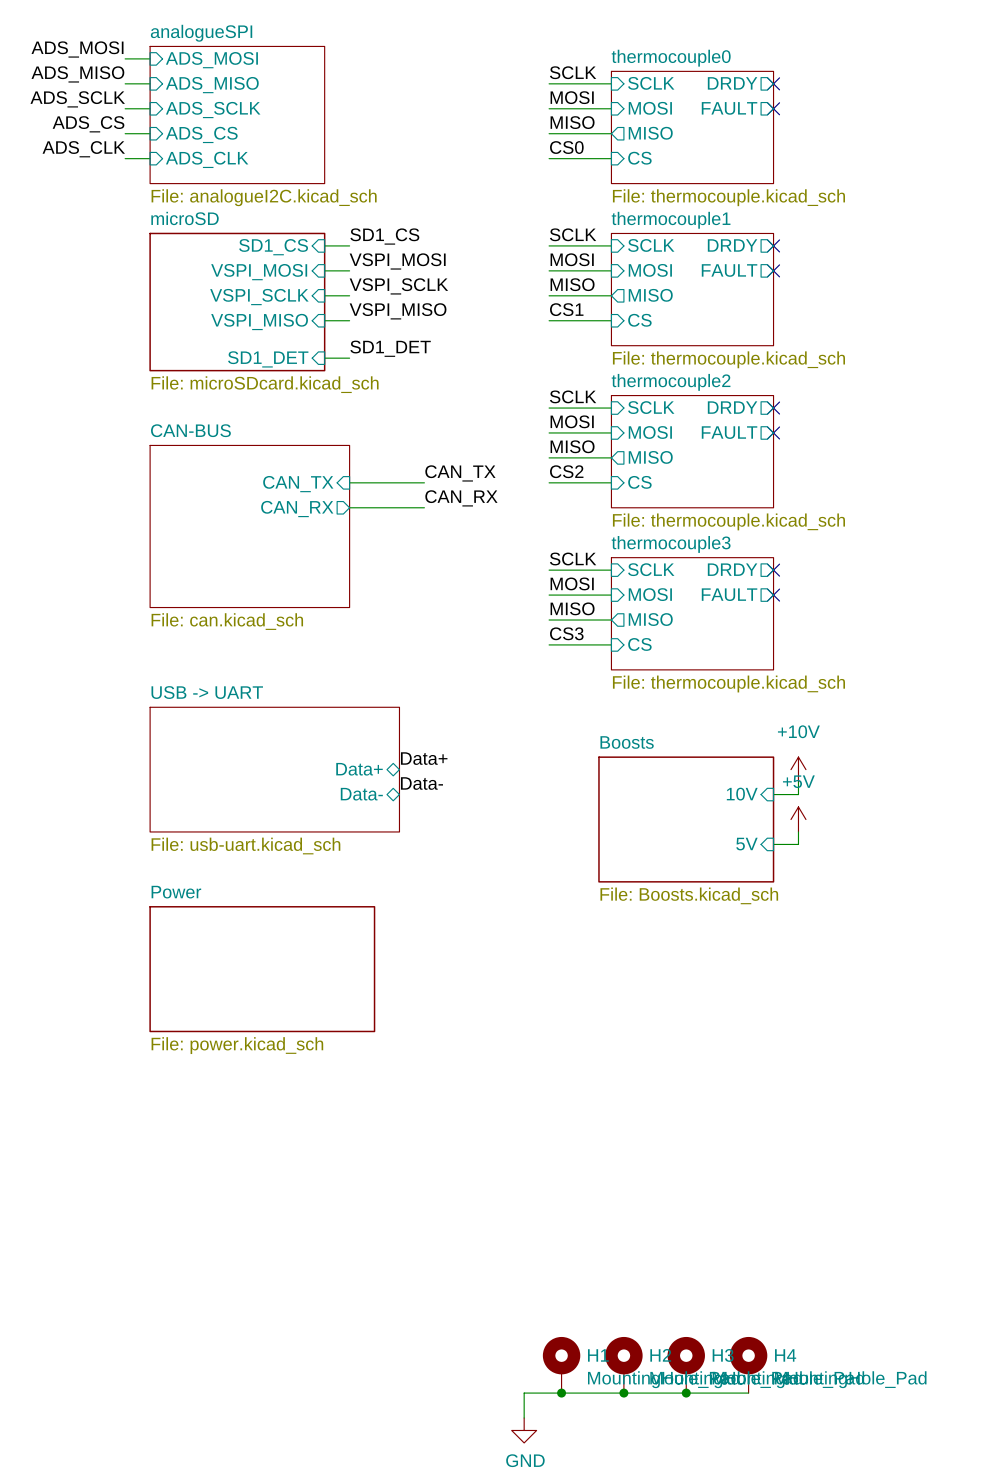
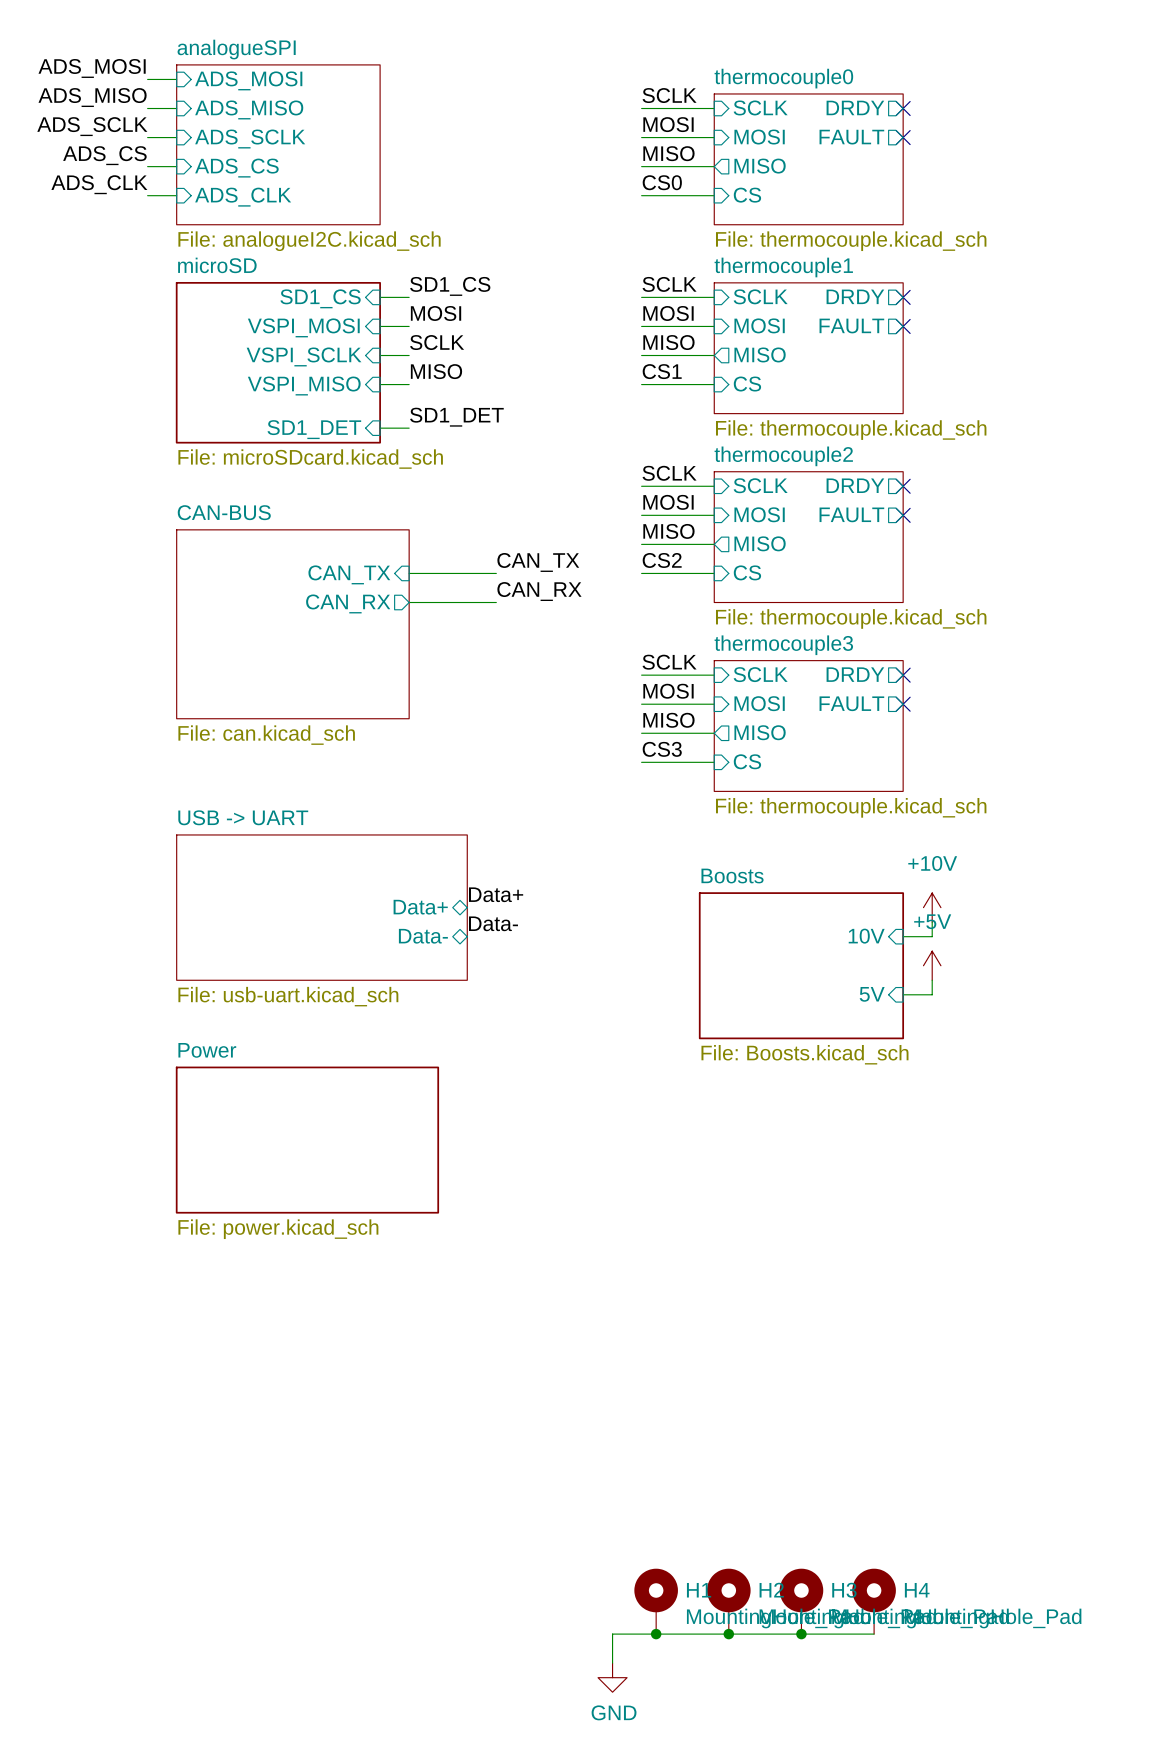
label: VSPI_MOSI (397, 261) -> MOSI (436, 313)
label: VSPI_SCLK (398, 286) -> SCLK (437, 342)
label: VSPI_MISO (398, 311) -> MISO (436, 371)

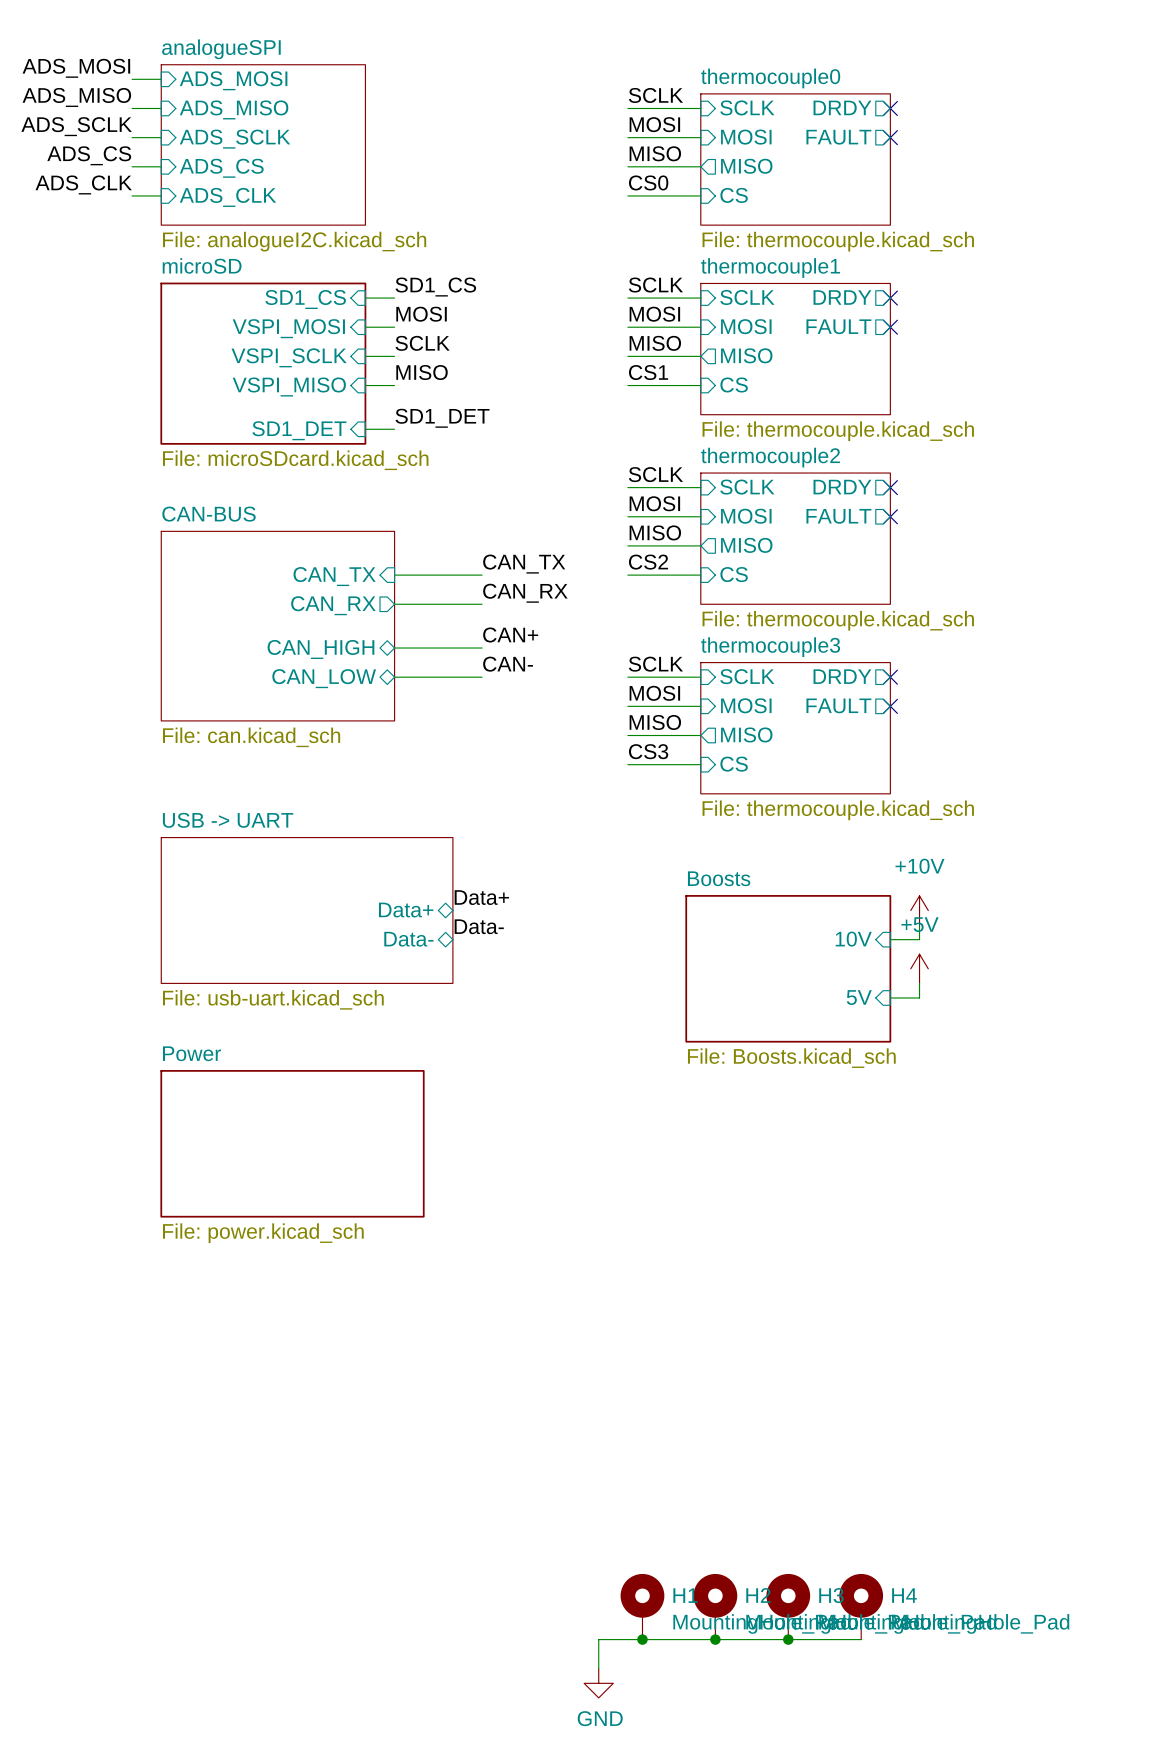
label: none -> CAN+ (510, 634)
wire: none -> (394, 648) (482, 648)
sheet pin: none -> CAN_HIGH (320, 649)
label: none -> CAN- (508, 664)
wire: none -> (394, 677) (482, 677)
sheet pin: none -> CAN_LOW (324, 678)

